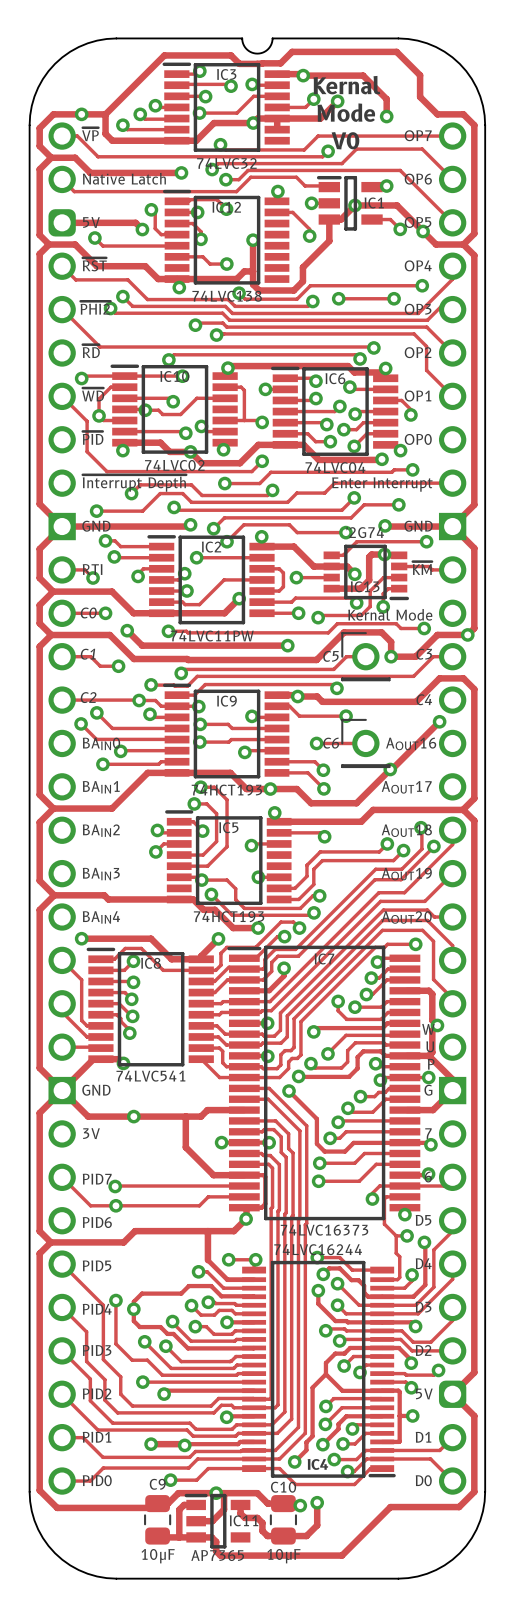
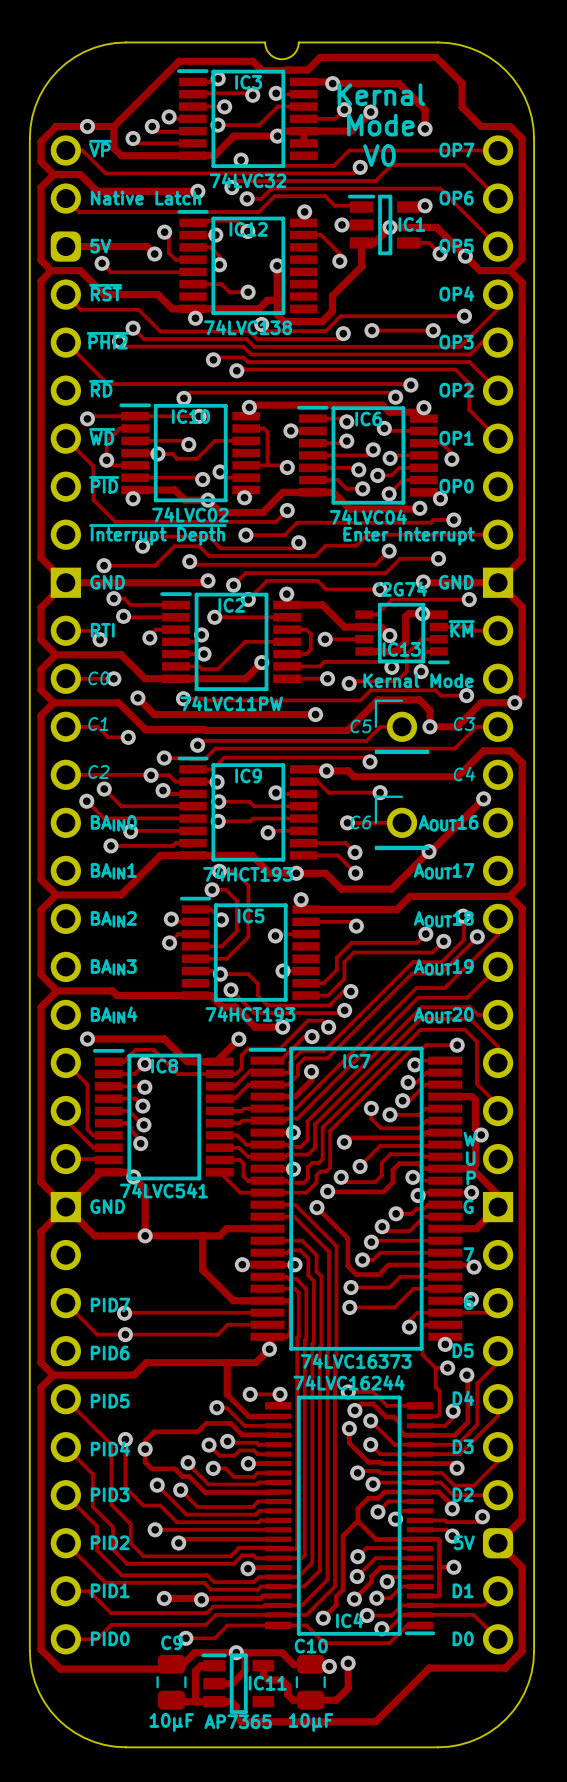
track: none -> (133, 1177) (145, 1188) (145, 1235)
text: 3V (91, 1133) -> none

